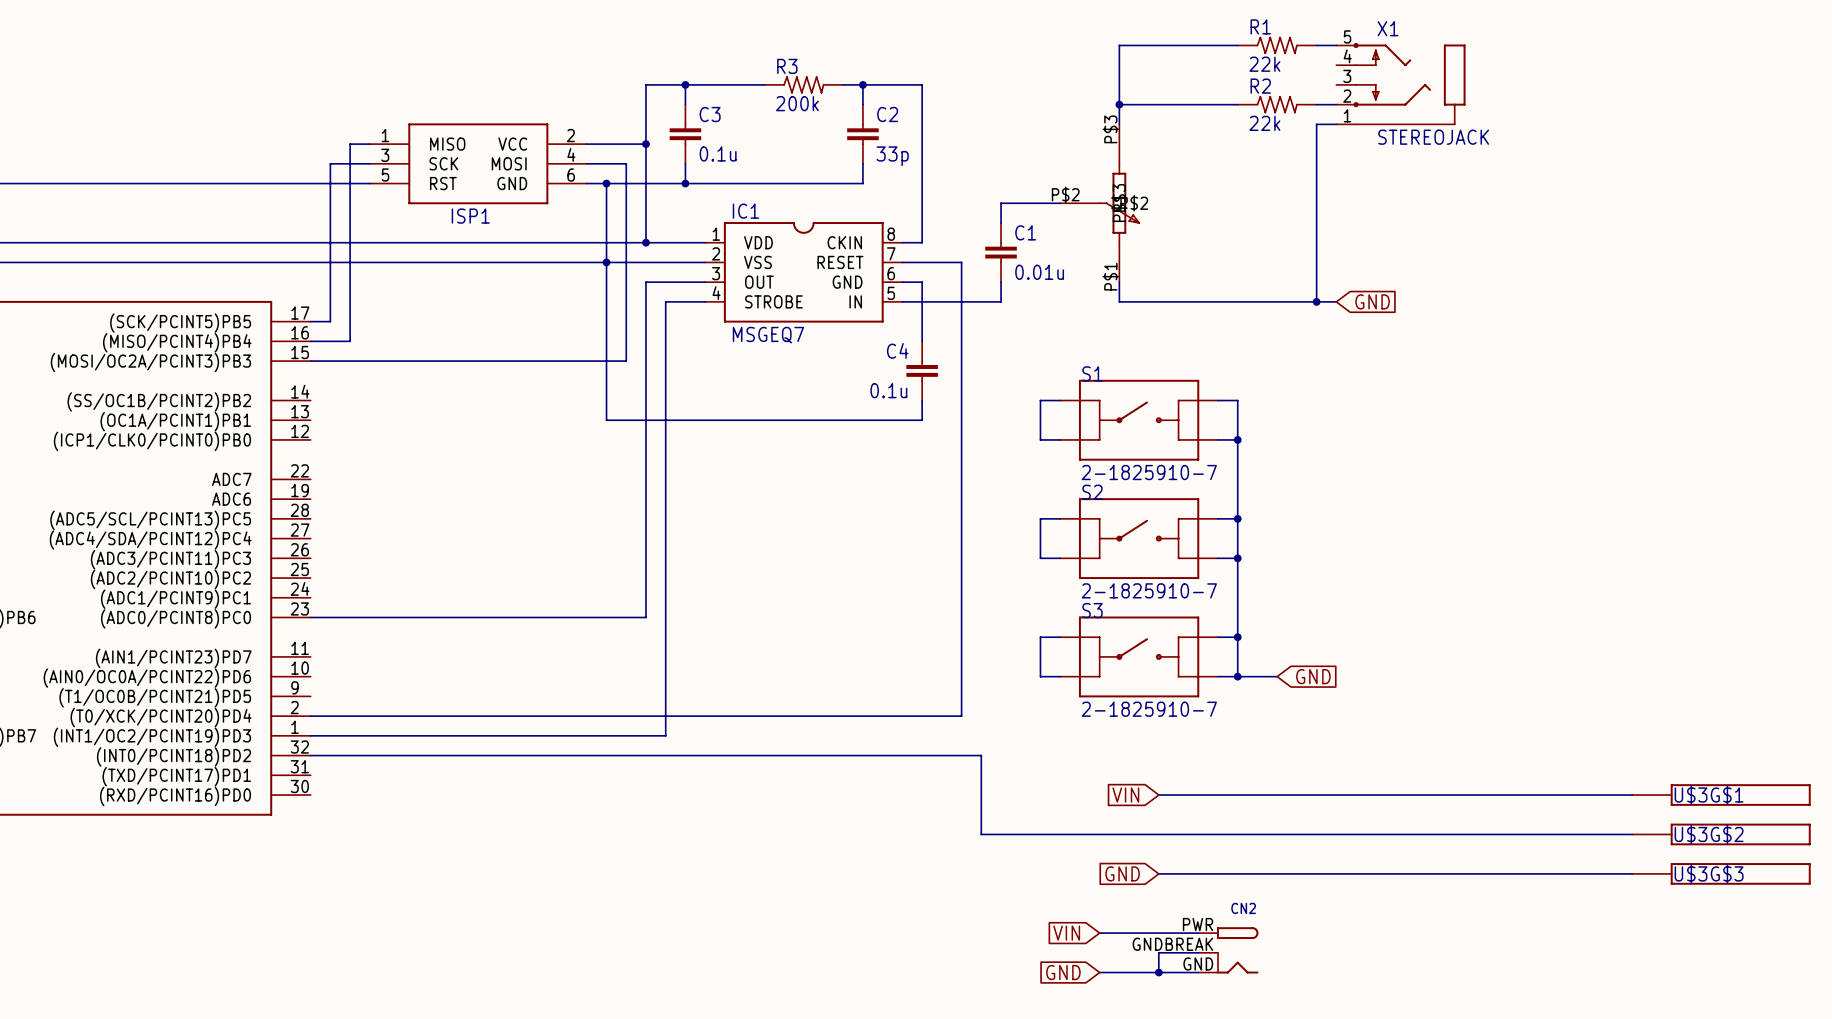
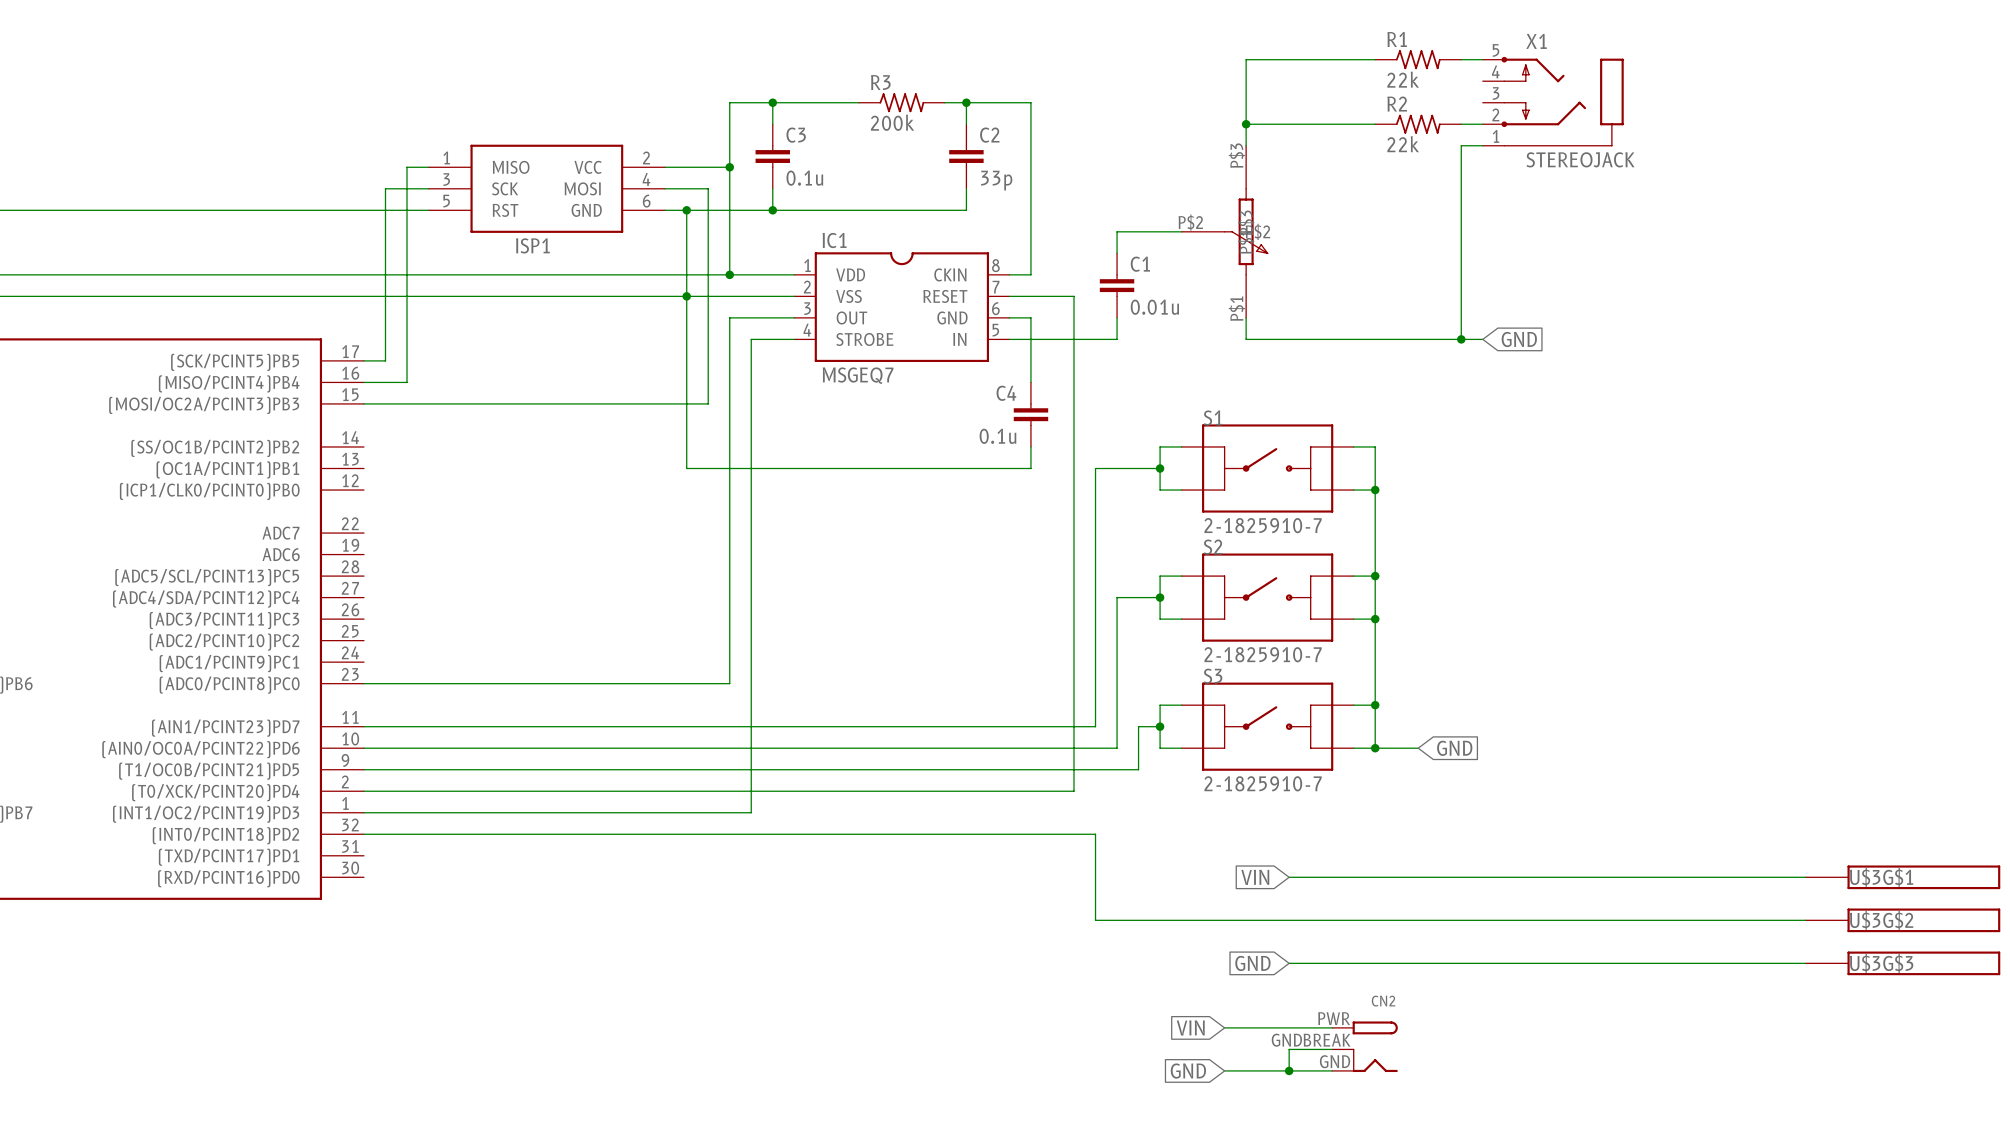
wire: none -> (1160, 468) (1095, 468) (1095, 726) (363, 726)
junction: none -> (1160, 468)
wire: none -> (1160, 597) (1117, 597) (1117, 748) (363, 748)
junction: none -> (1160, 597)
wire: none -> (1160, 726) (1138, 726) (1138, 769) (363, 769)
junction: none -> (1160, 726)

